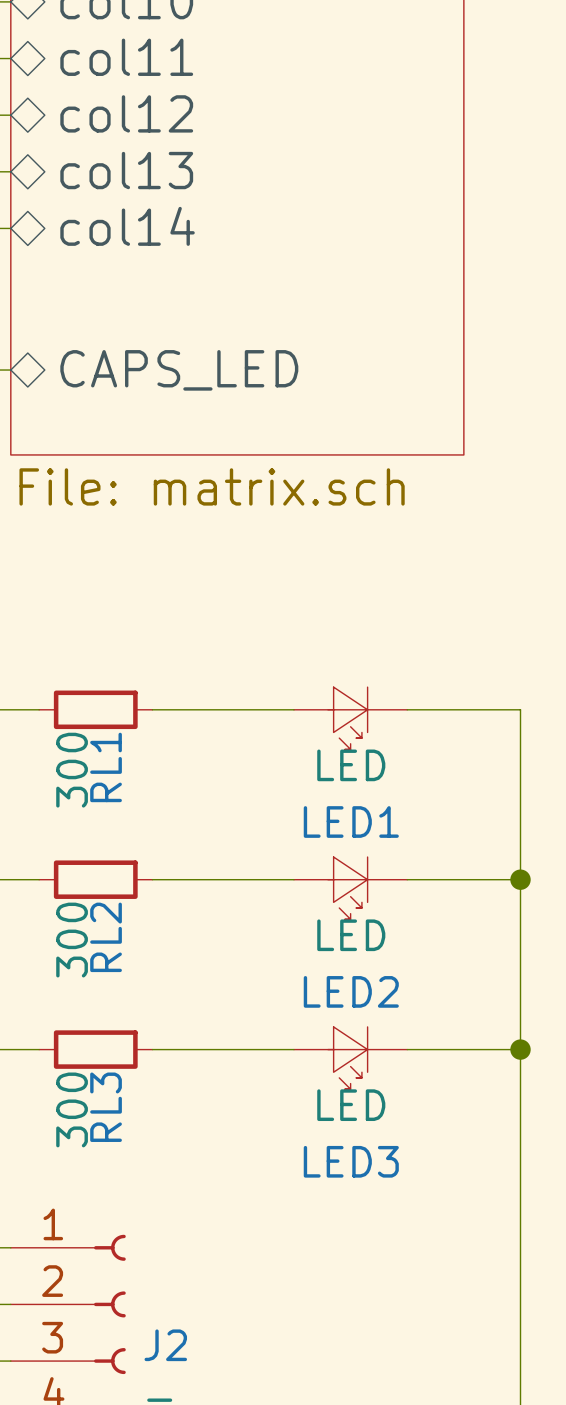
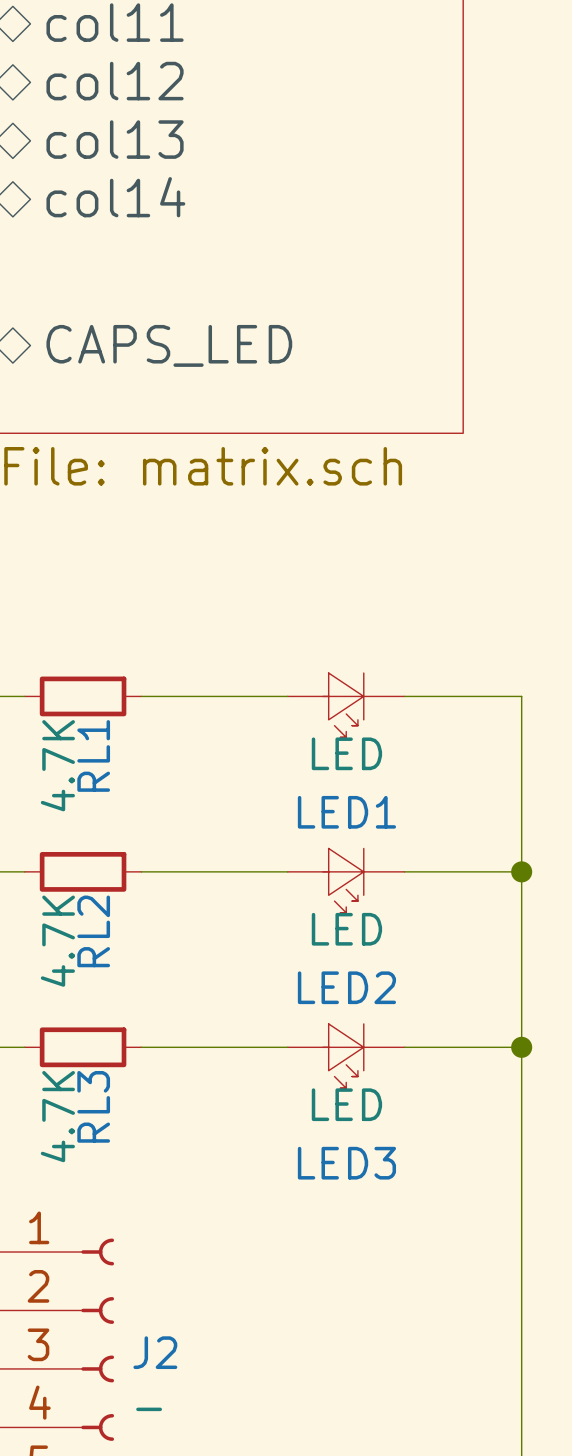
RL1 value: 300 (72, 770) -> 4.7K (57, 765)
RL2 value: 300 (72, 940) -> 4.7K (57, 941)
RL3 value: 300 (72, 1109) -> 4.7K (57, 1116)

